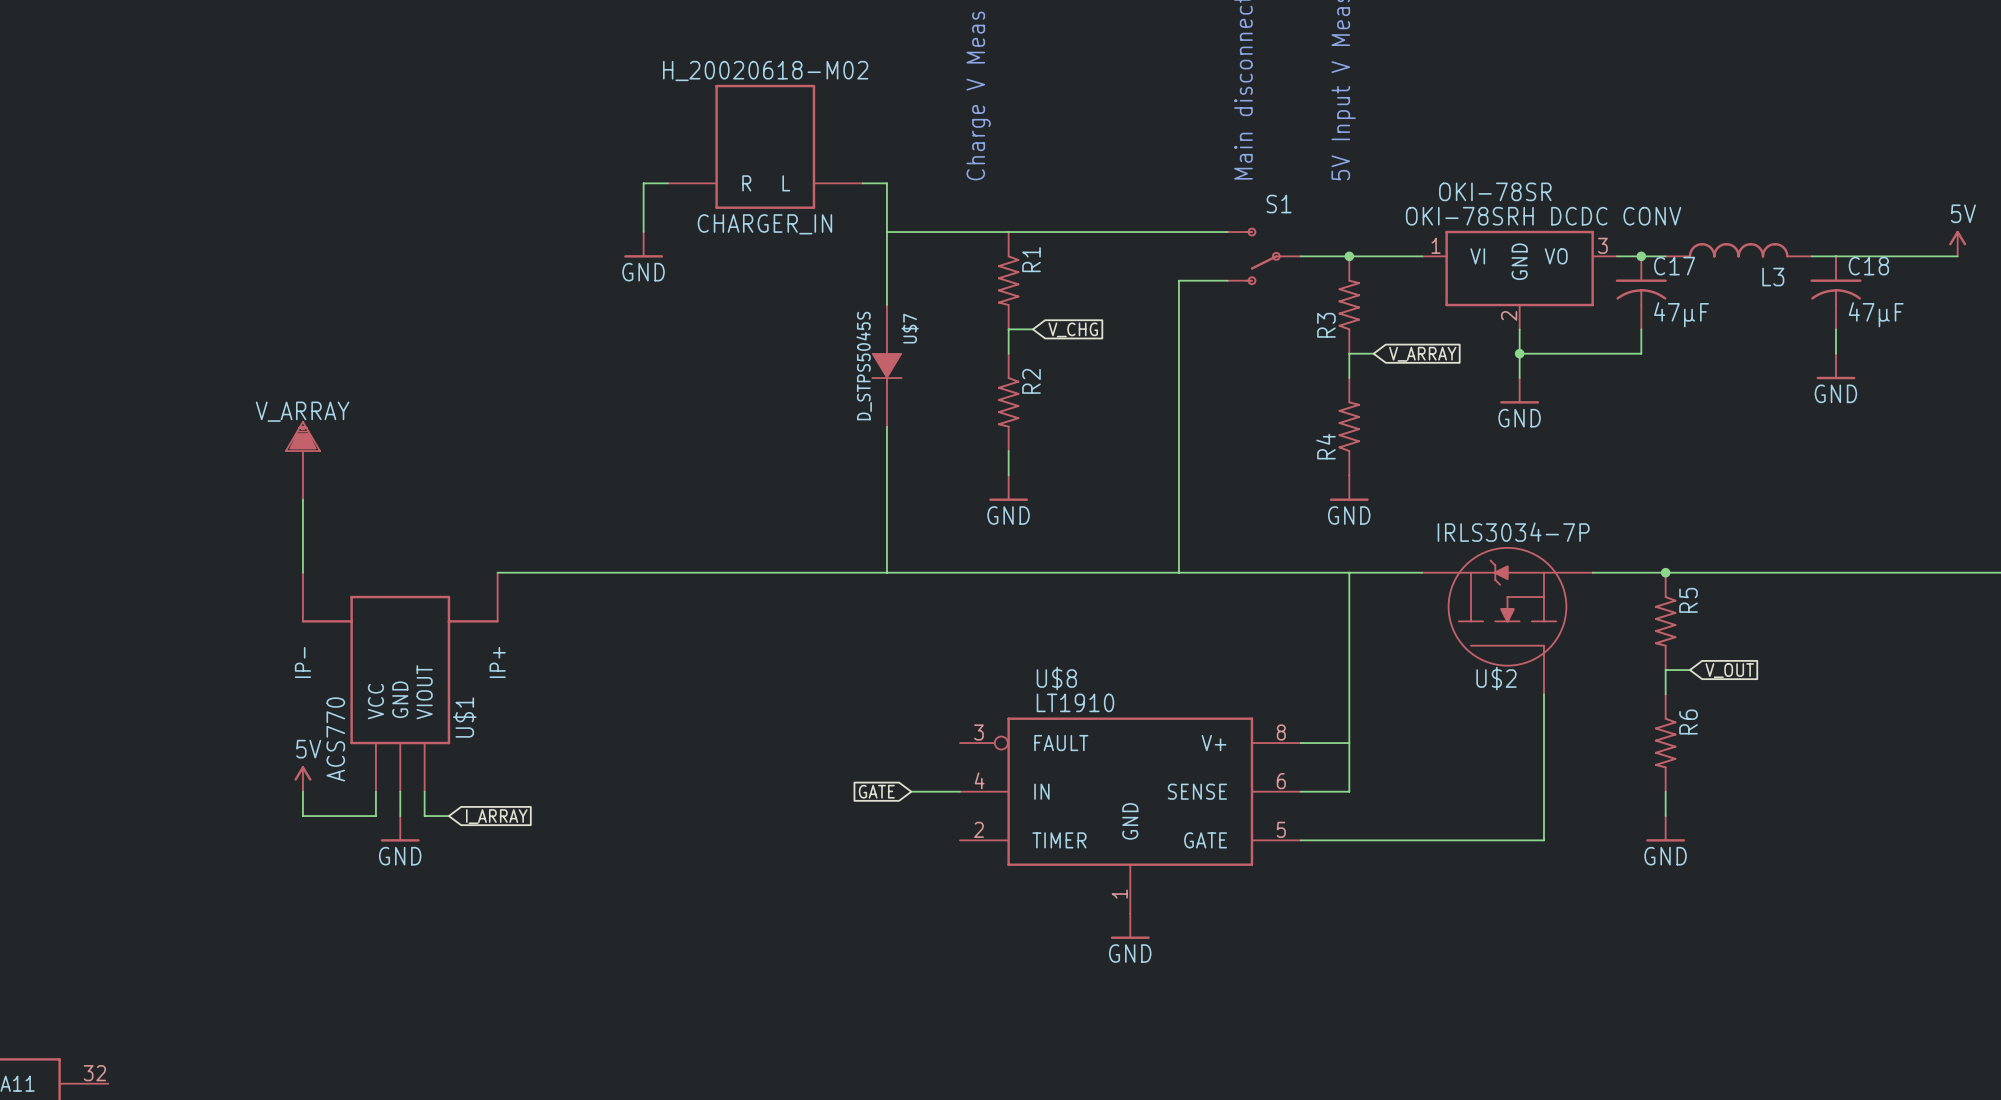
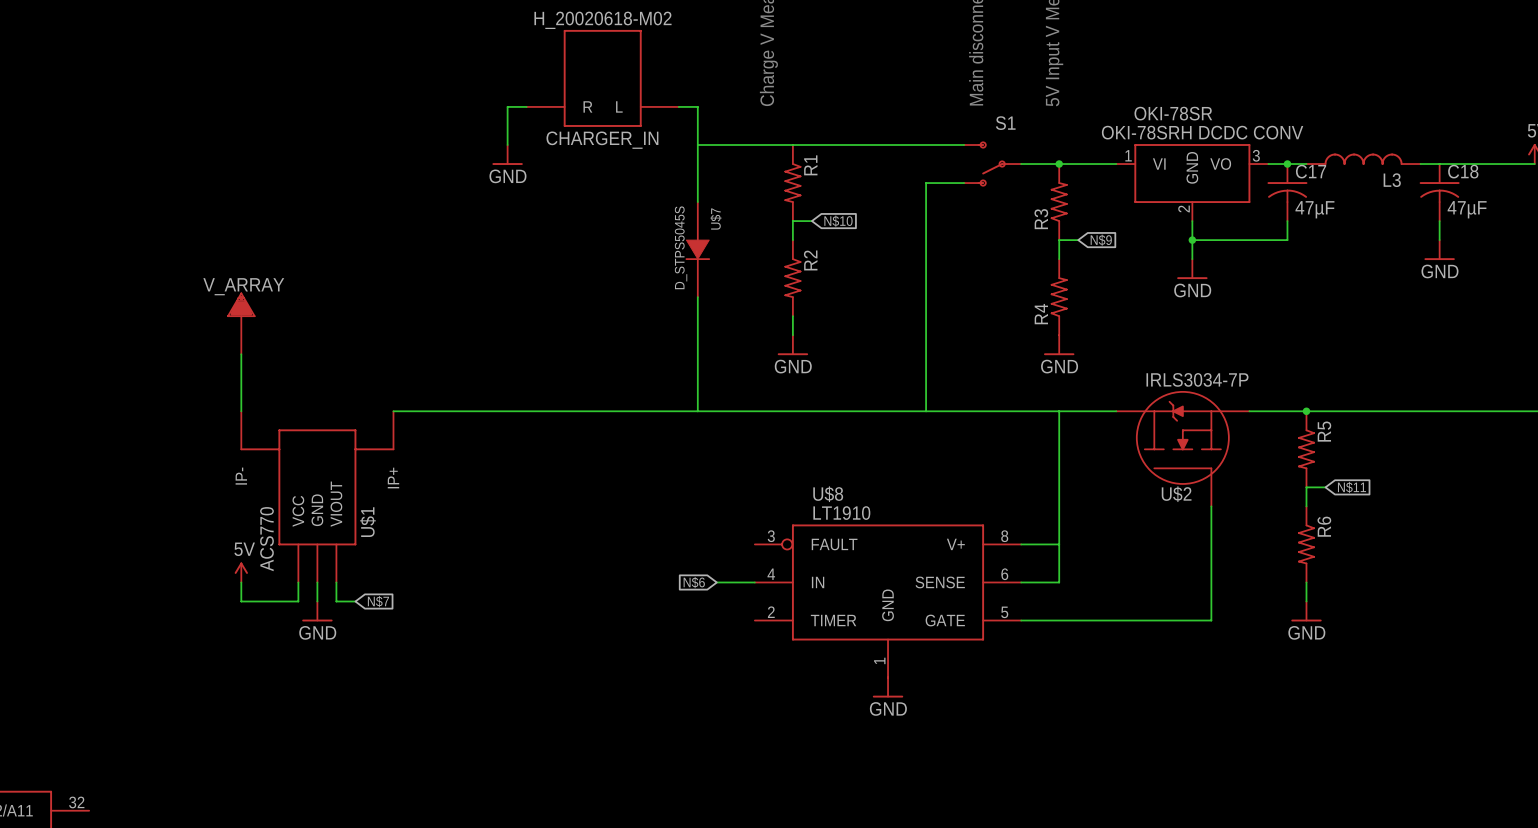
global label: V_CHG (1073, 329) -> N$10 (838, 221)
global label: V_ARRAY (1422, 354) -> N$9 (1101, 240)
global label: V_OUT (1729, 670) -> N$11 (1351, 487)
global label: GATE (876, 791) -> N$6 (694, 582)
global label: I_ARRAY (496, 816) -> N$7 (378, 601)

